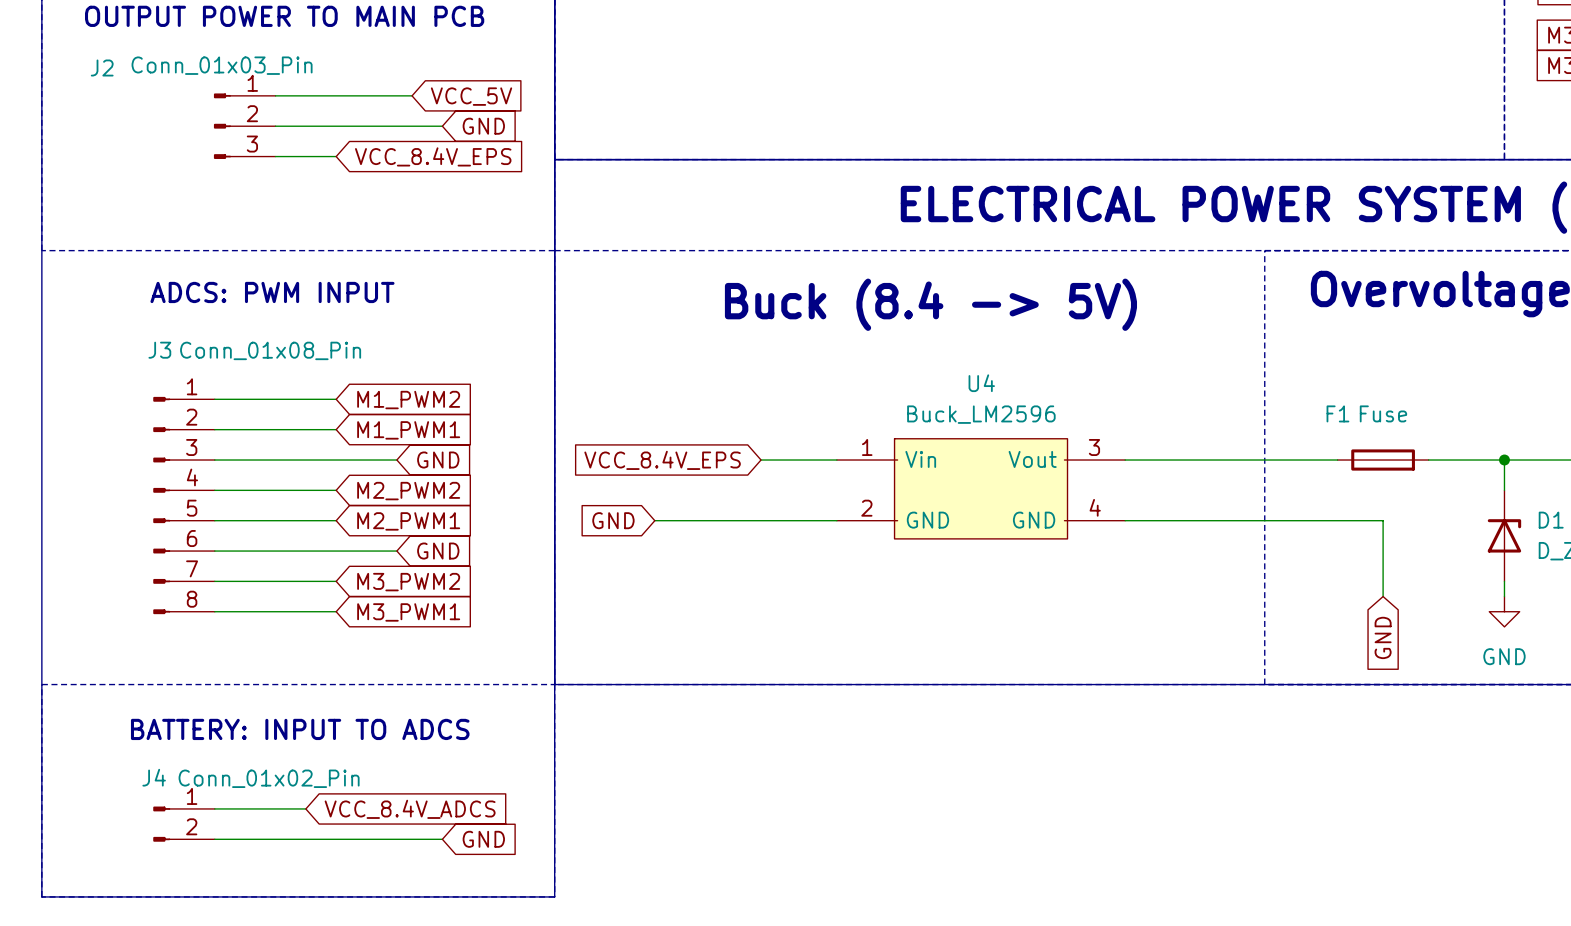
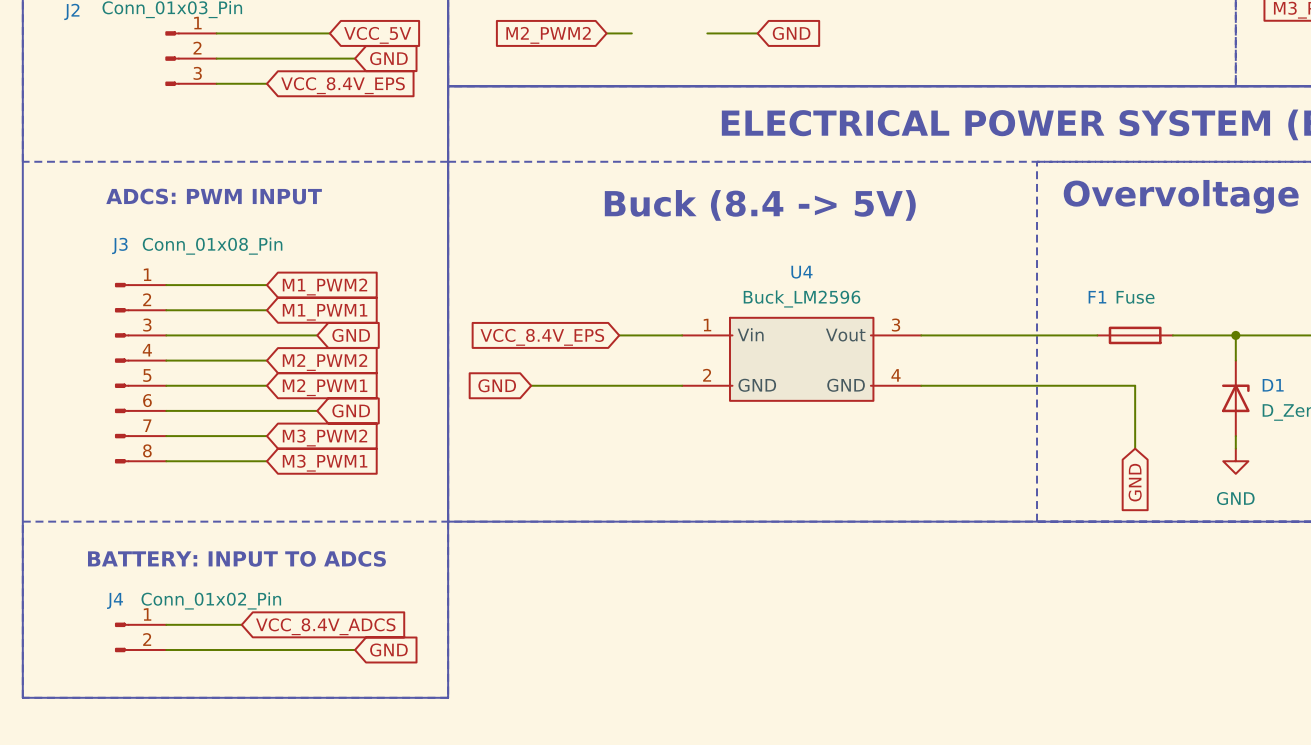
wire: none -> (606, 33) (631, 33)
wire: none -> (707, 33) (757, 33)
global label: none -> GND (791, 33)
global label: none -> M2_PWM2 (548, 35)

